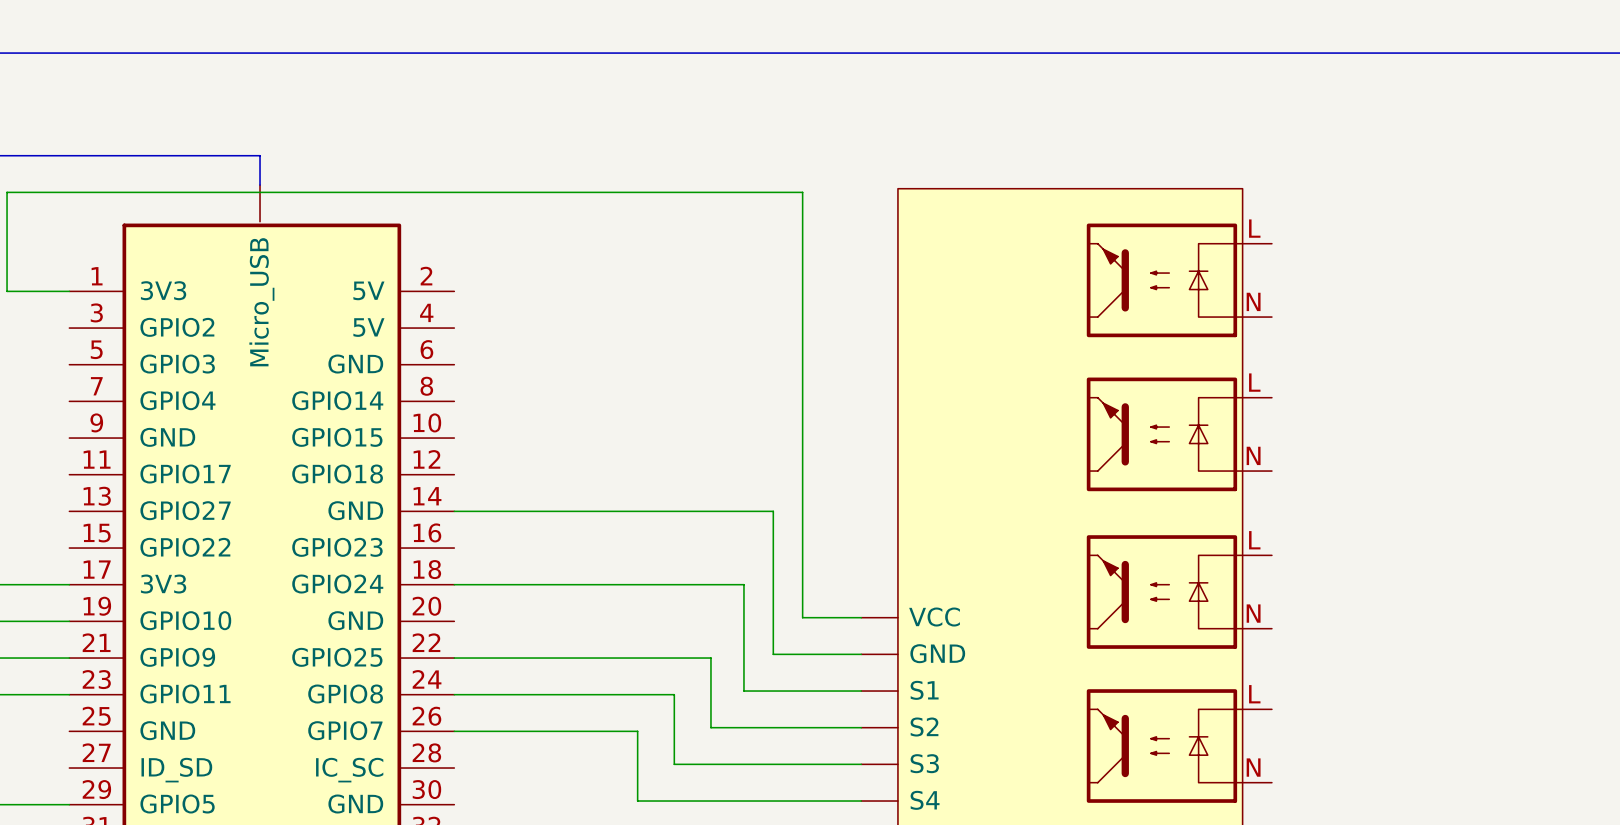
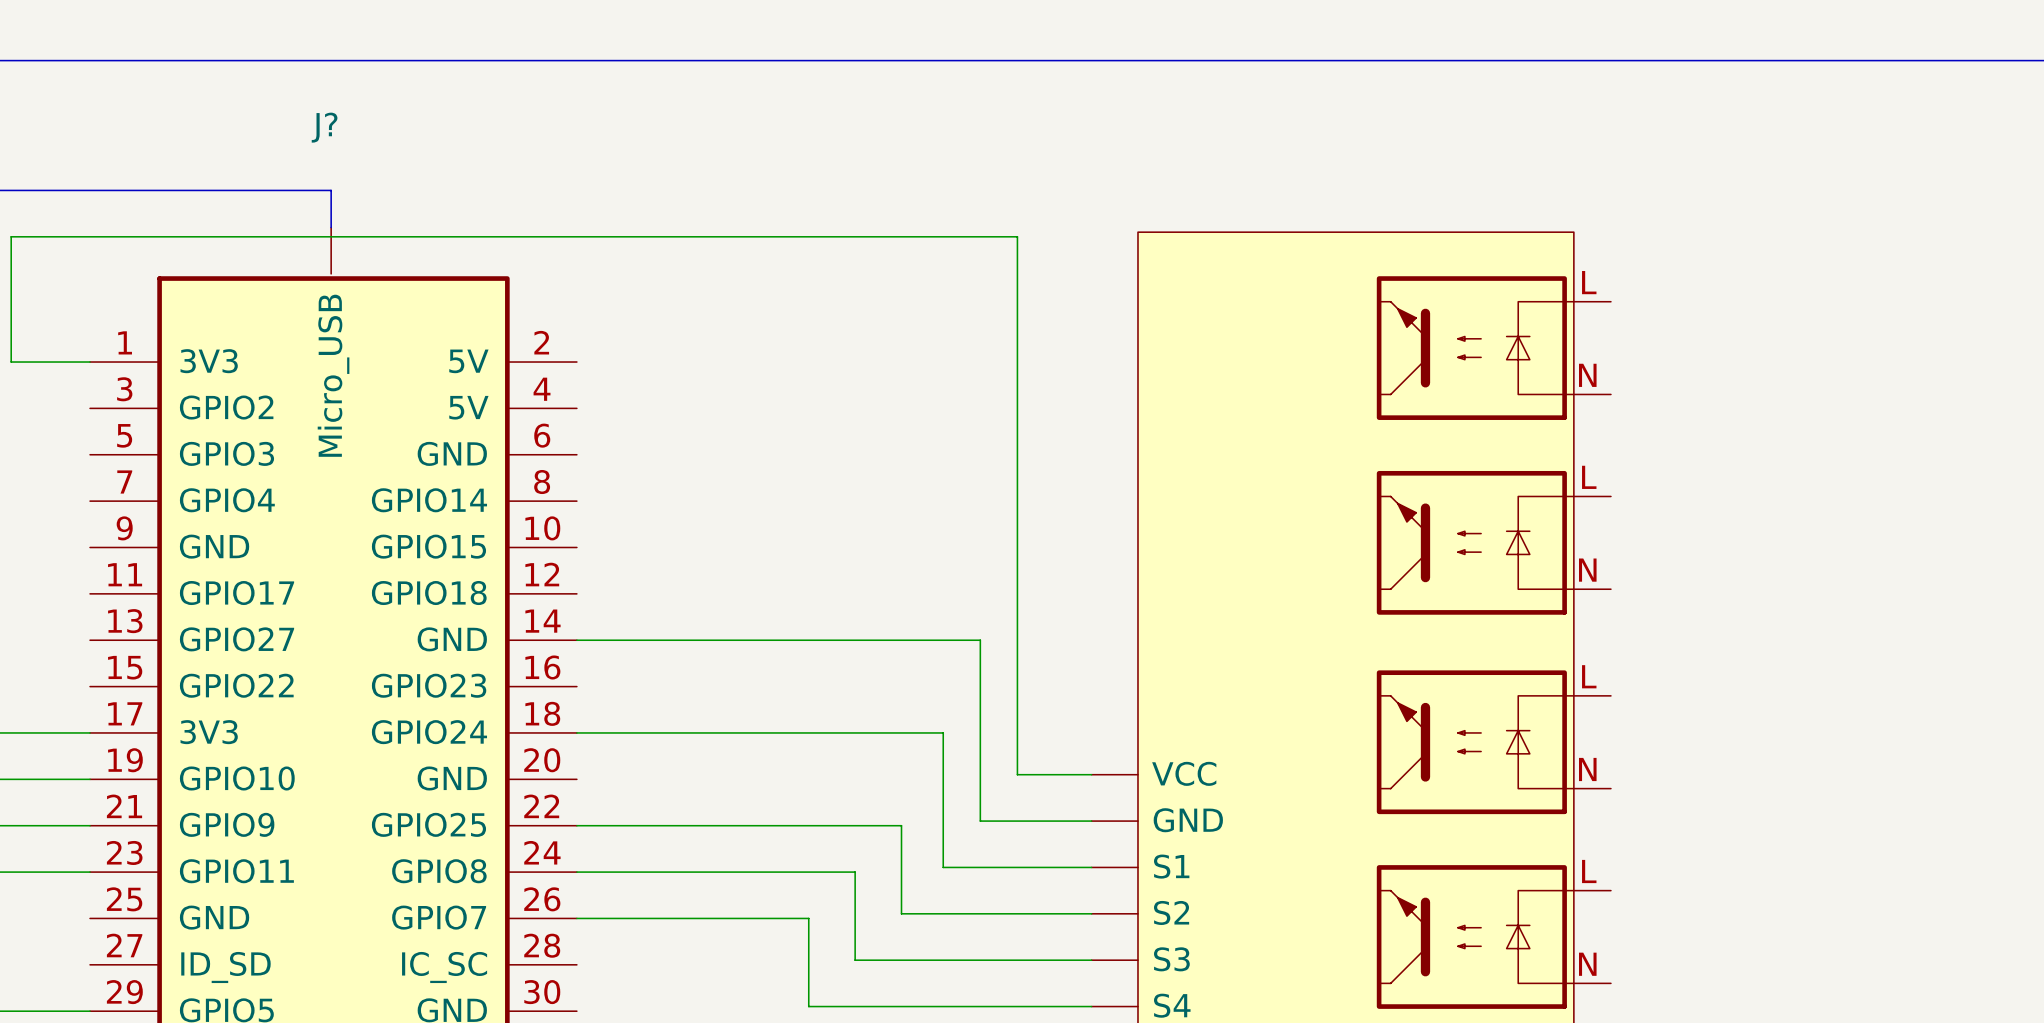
J? name: none -> J? (324, 127)

